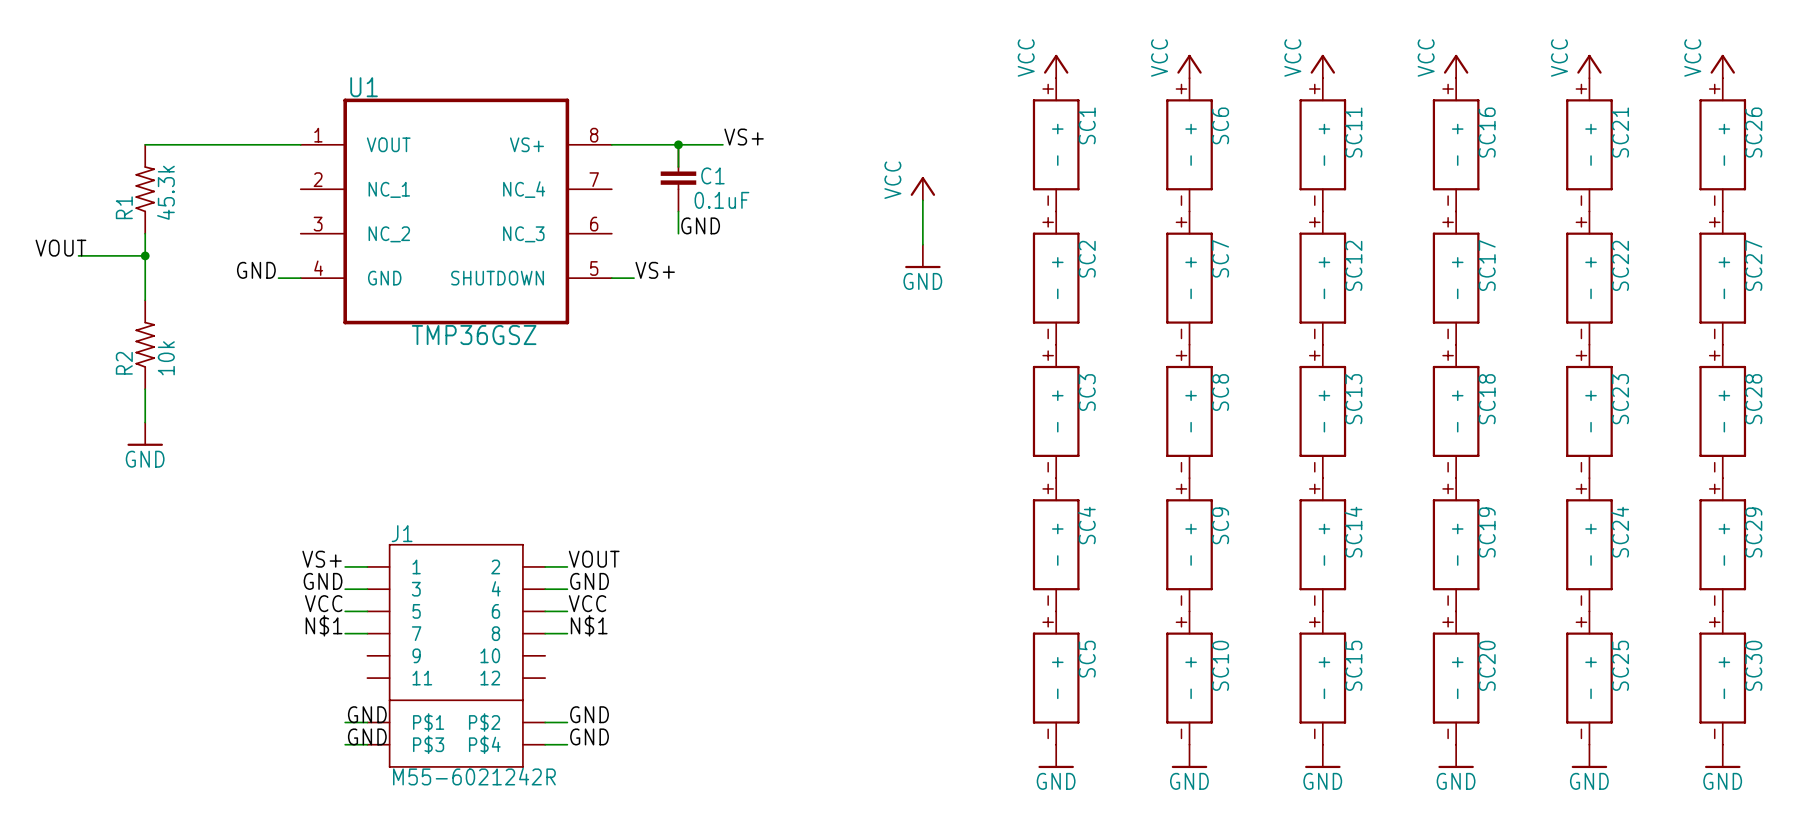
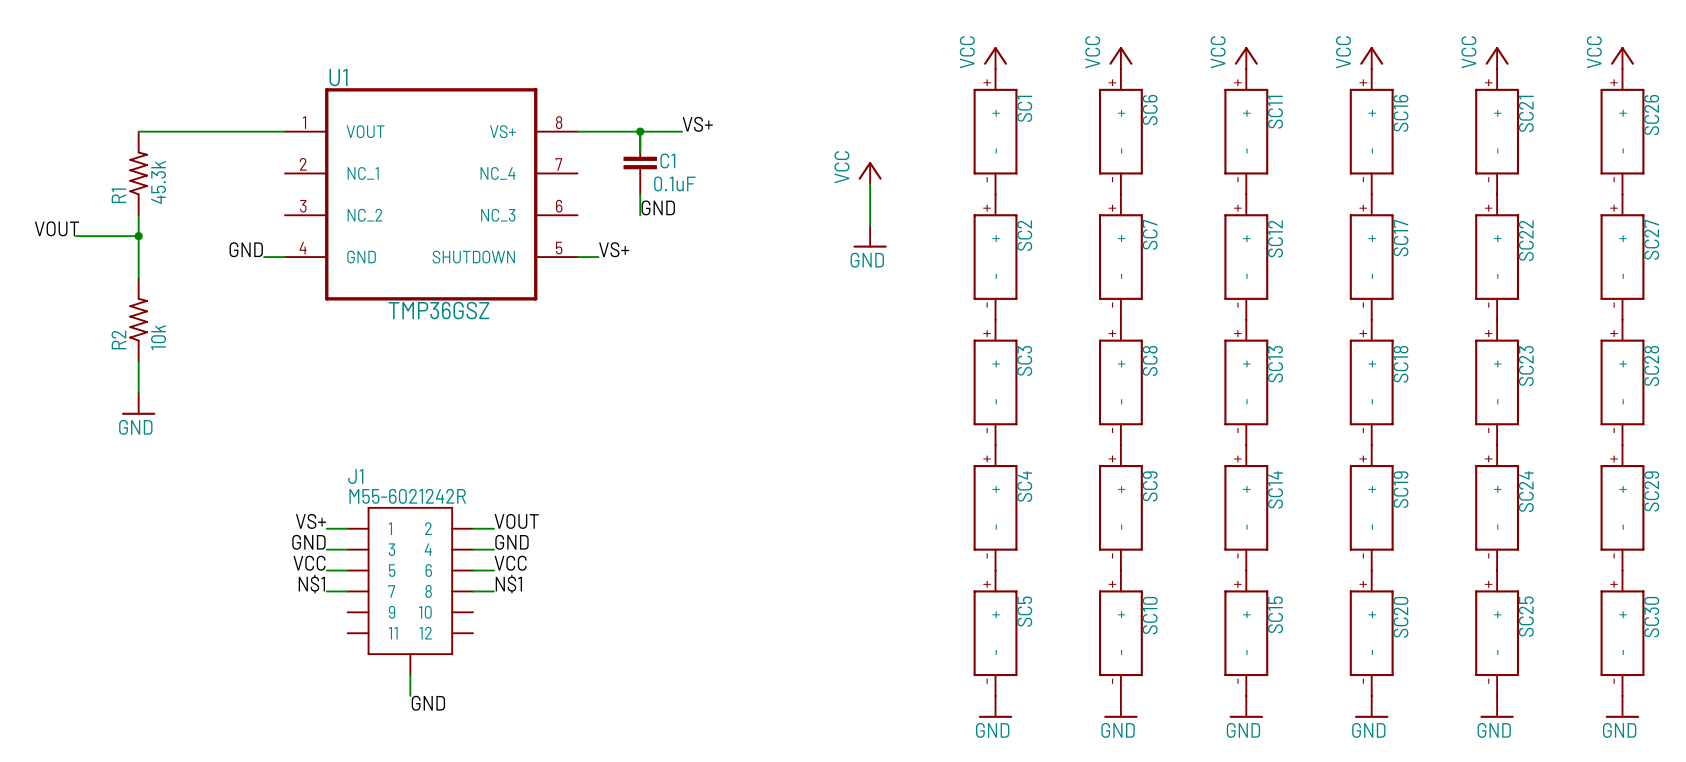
J1 symbol: [367, 544, 546, 768] -> [347, 507, 474, 676]
label position: VOUT (594, 559) -> VOUT (516, 521)
wire: (545, 566) (567, 566) -> (473, 528) (493, 528)
label position: GND (589, 581) -> GND (511, 542)
wire: (545, 589) (567, 589) -> (473, 549) (493, 549)
label position: VCC (587, 603) -> VCC (510, 563)
wire: (545, 611) (567, 611) -> (473, 570) (493, 570)
label position: N$1 (589, 625) -> N$1 (508, 584)
wire: (545, 633) (567, 633) -> (473, 591) (493, 591)
label: GND (367, 714) -> none
label: GND (589, 714) -> none
wire: (345, 722) (367, 722) -> none
wire: none -> (410, 675) (410, 695)
wire: (545, 722) (567, 722) -> none
label: GND (367, 736) -> none
label: GND (589, 736) -> none
wire: (345, 744) (367, 744) -> none
wire: (545, 744) (567, 744) -> none
label: none -> GND (428, 703)
J1 value position: M55-6021242R (474, 776) -> M55-6021242R (407, 496)

